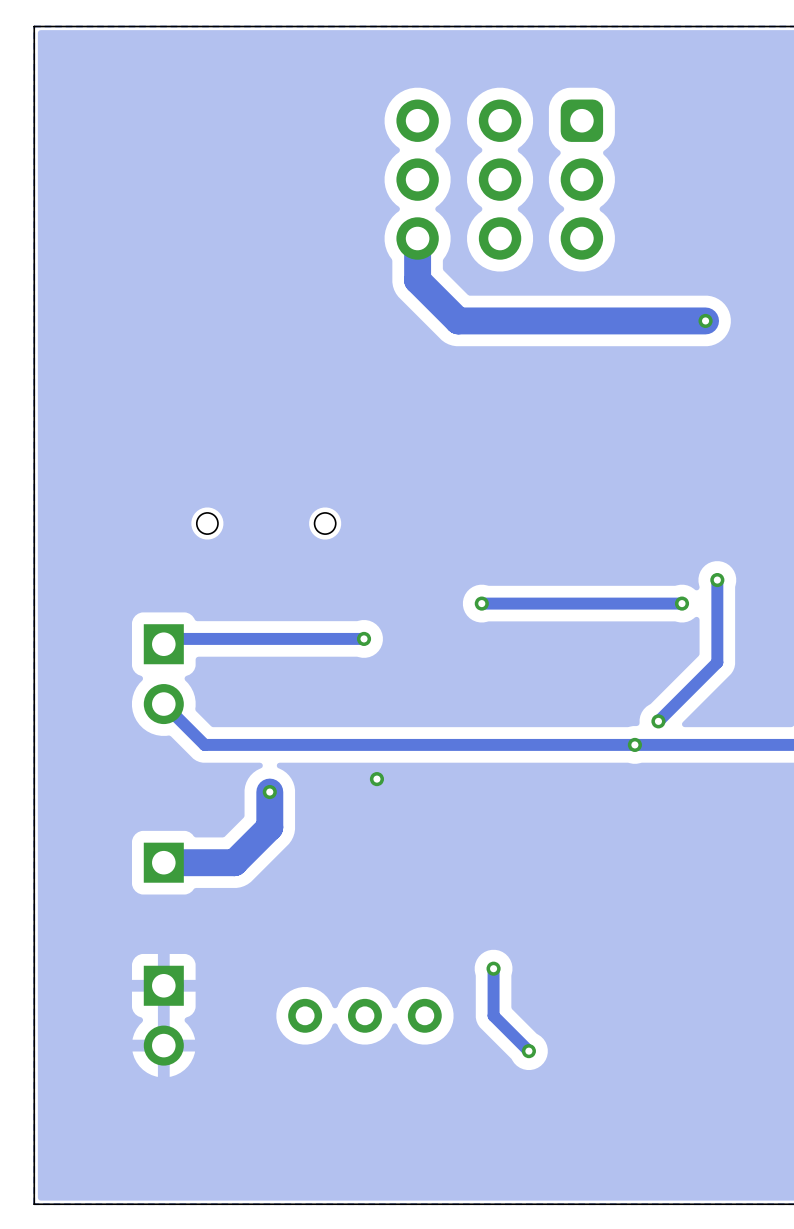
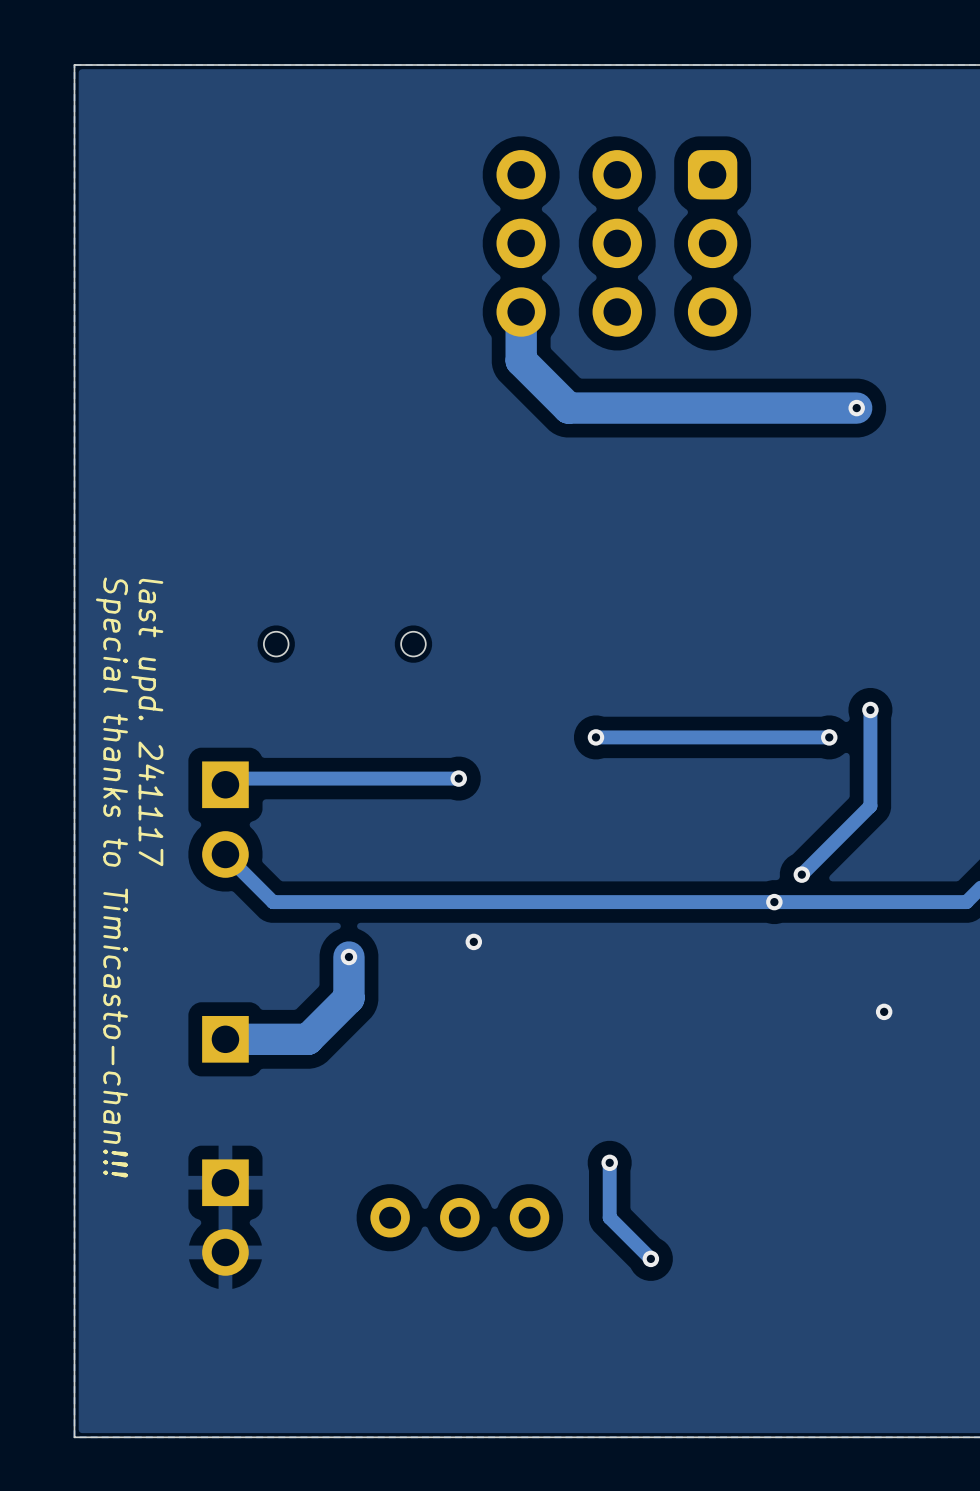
text: none -> last upd. 241117 (147, 722)
text: none -> Special thanks to Timicasto-chan!!! (111, 877)
via: none -> (884, 1011)

